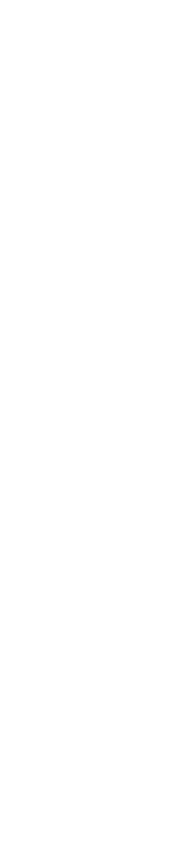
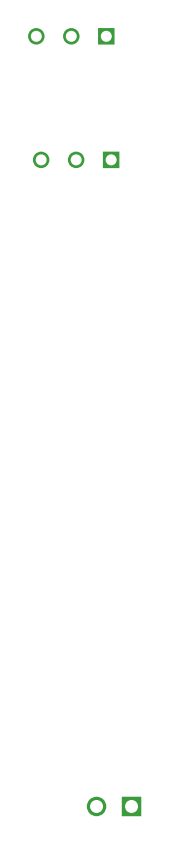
part: none -> (71, 36)
part: none -> (76, 159)
part: none -> (114, 806)

